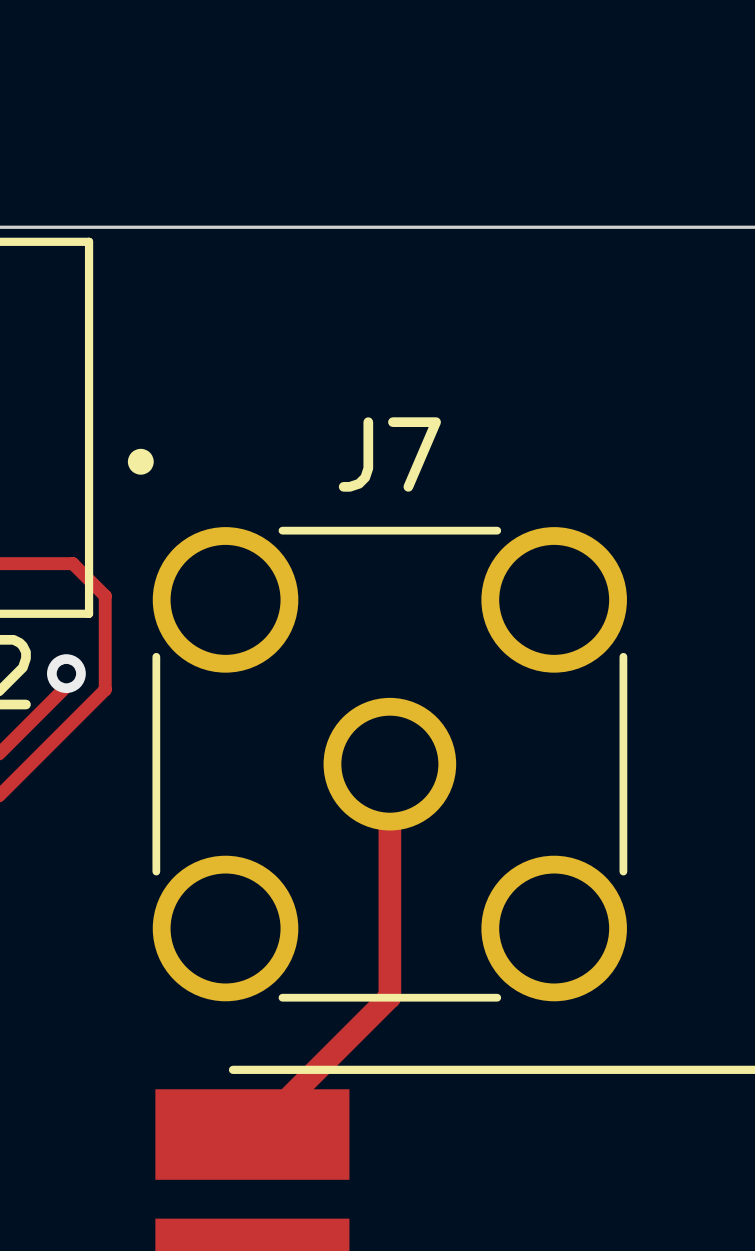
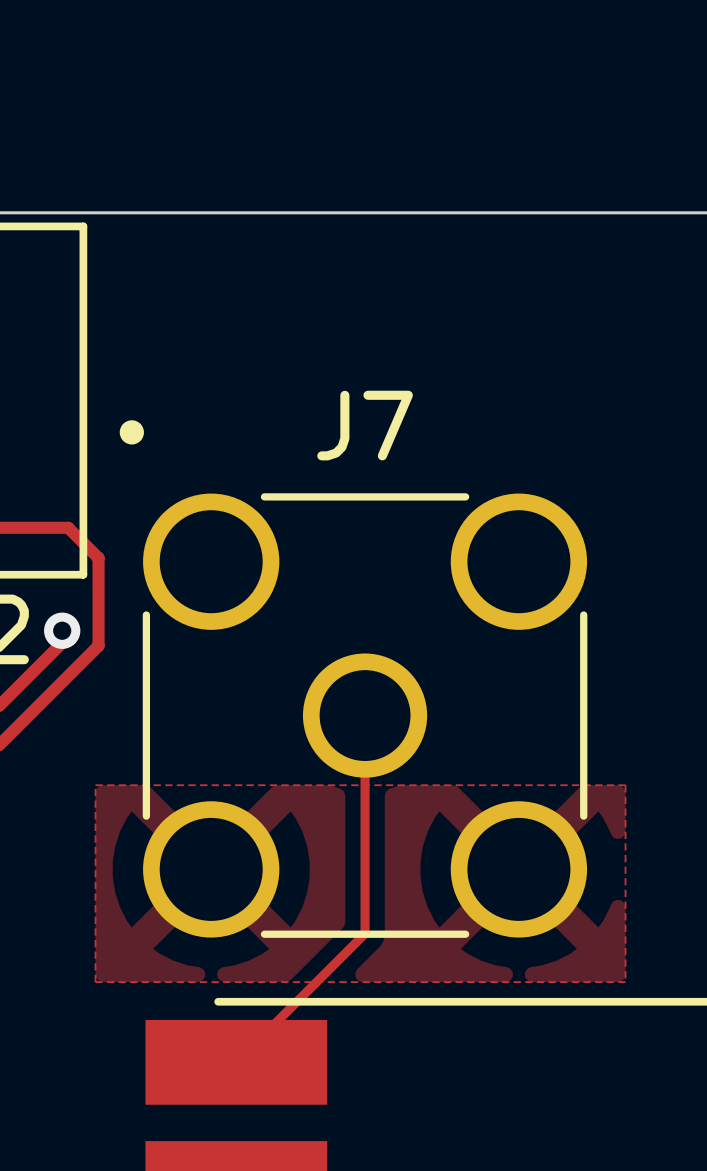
track width: thick (389, 764) (389, 997) (252, 1134) -> thin (365, 715) (365, 933) (236, 1062)
zone outline: none -> (95, 785) (625, 785) (625, 982) (95, 982) (95, 785)

